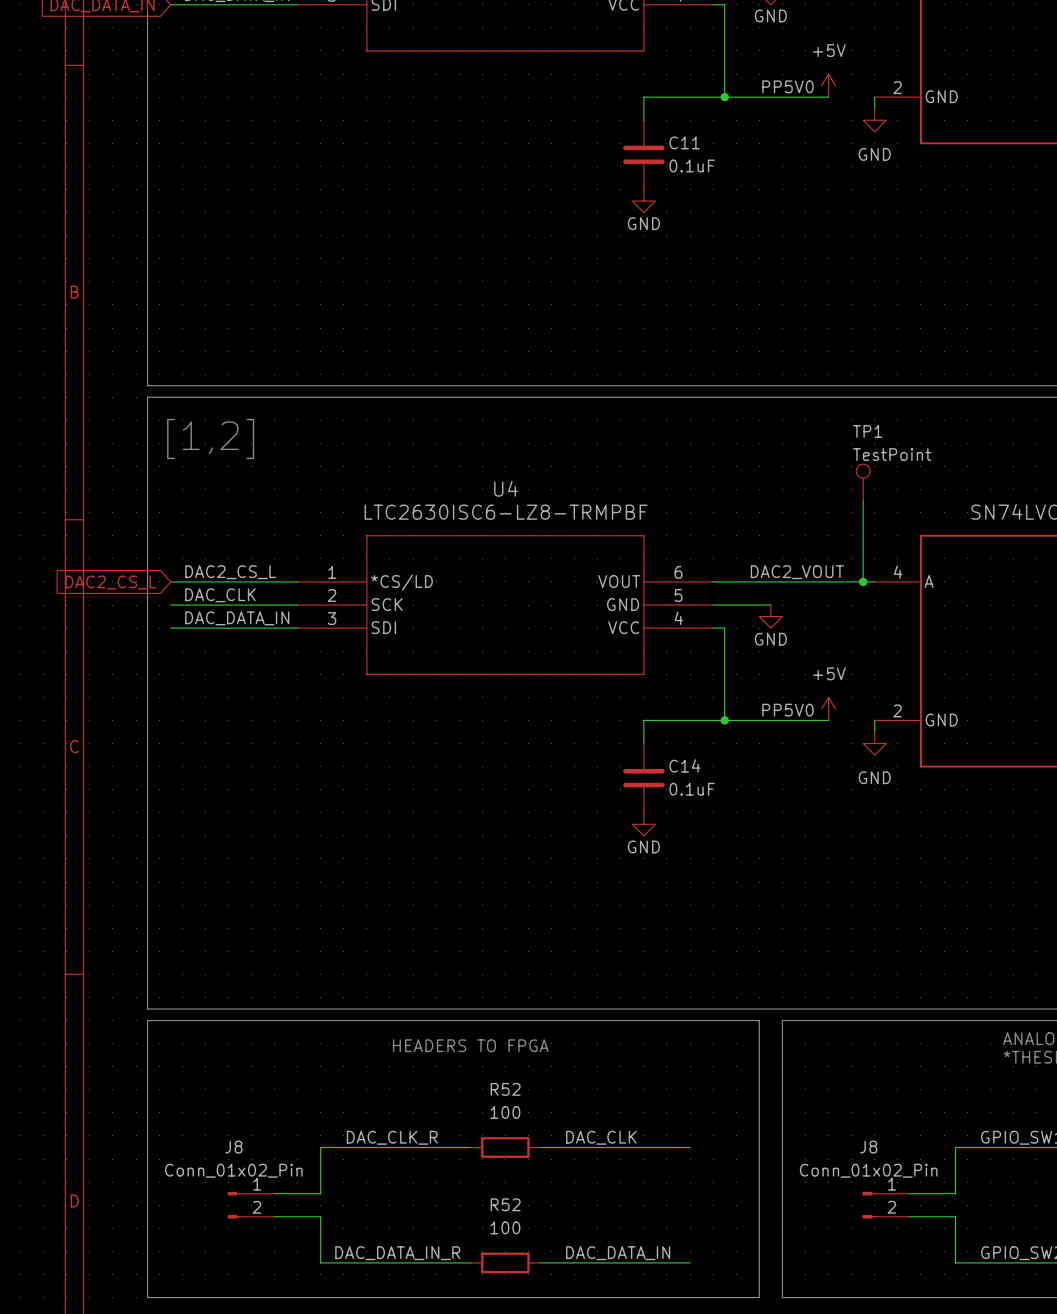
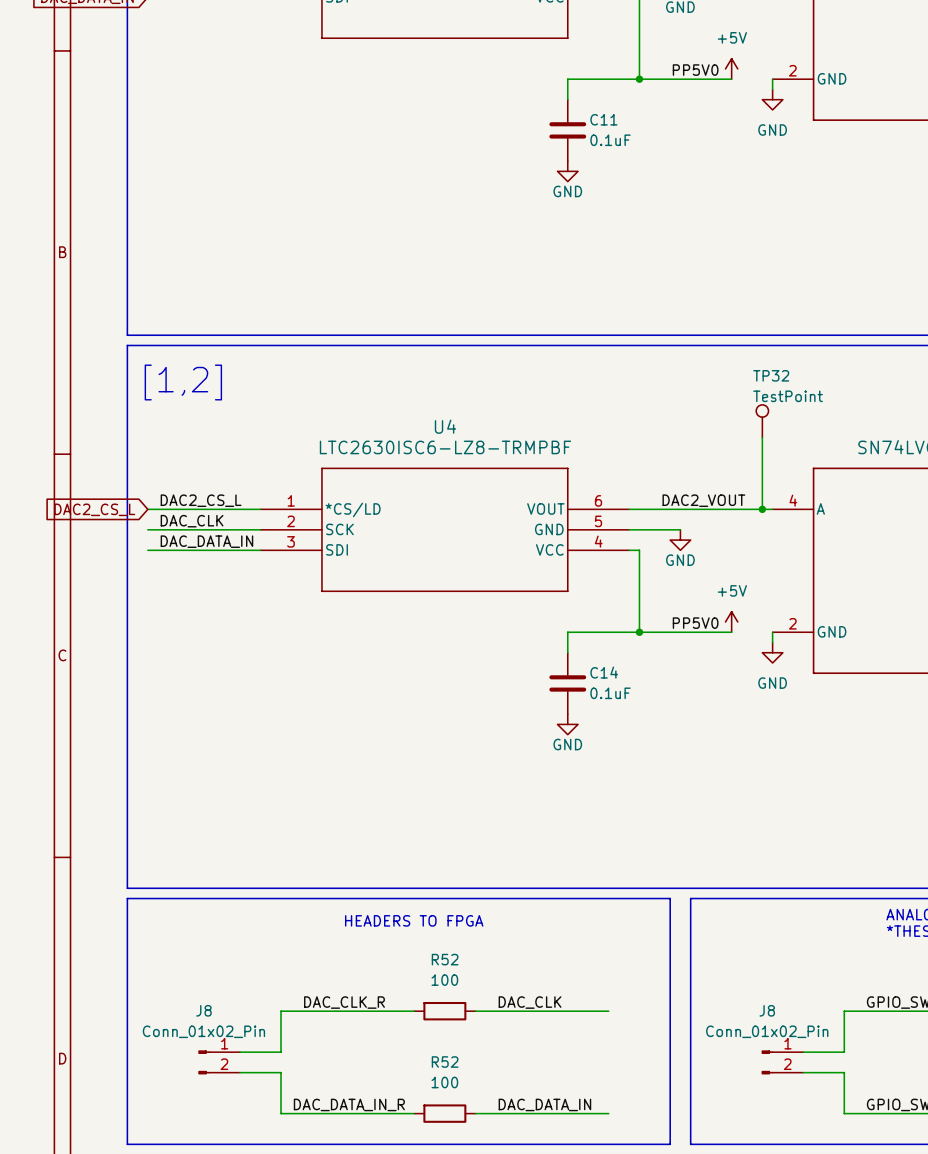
TP1 name: TP1 (867, 431) -> TP32 (771, 375)

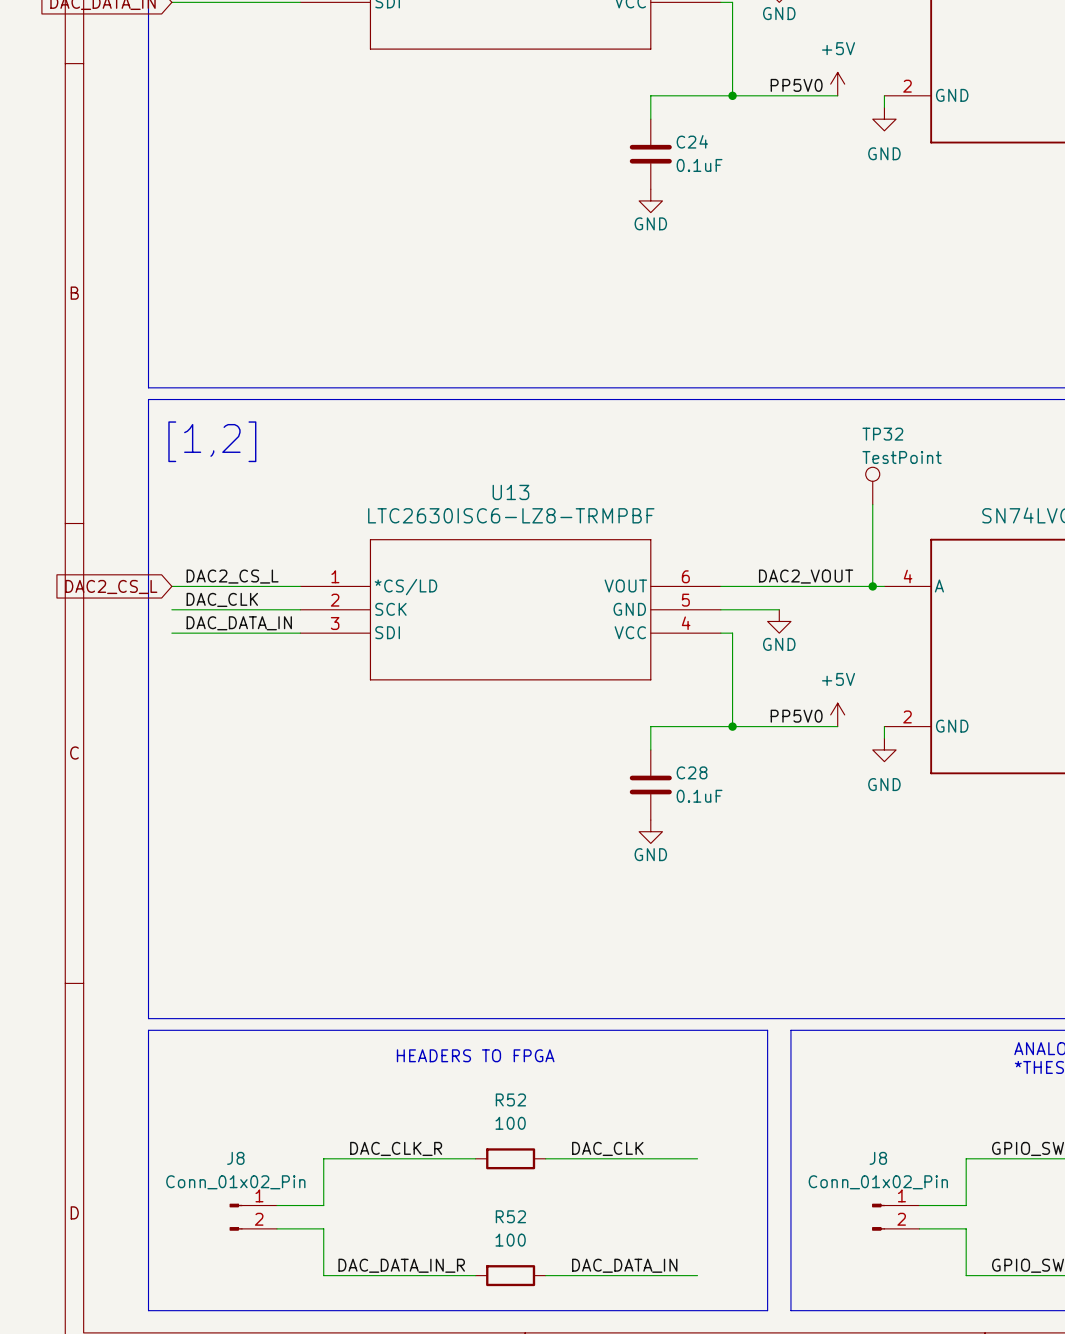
C11 name: C11 (603, 119) -> C24 (692, 141)
U4 name: U4 (445, 426) -> U13 (510, 492)
C14 name: C14 (604, 672) -> C28 (692, 772)

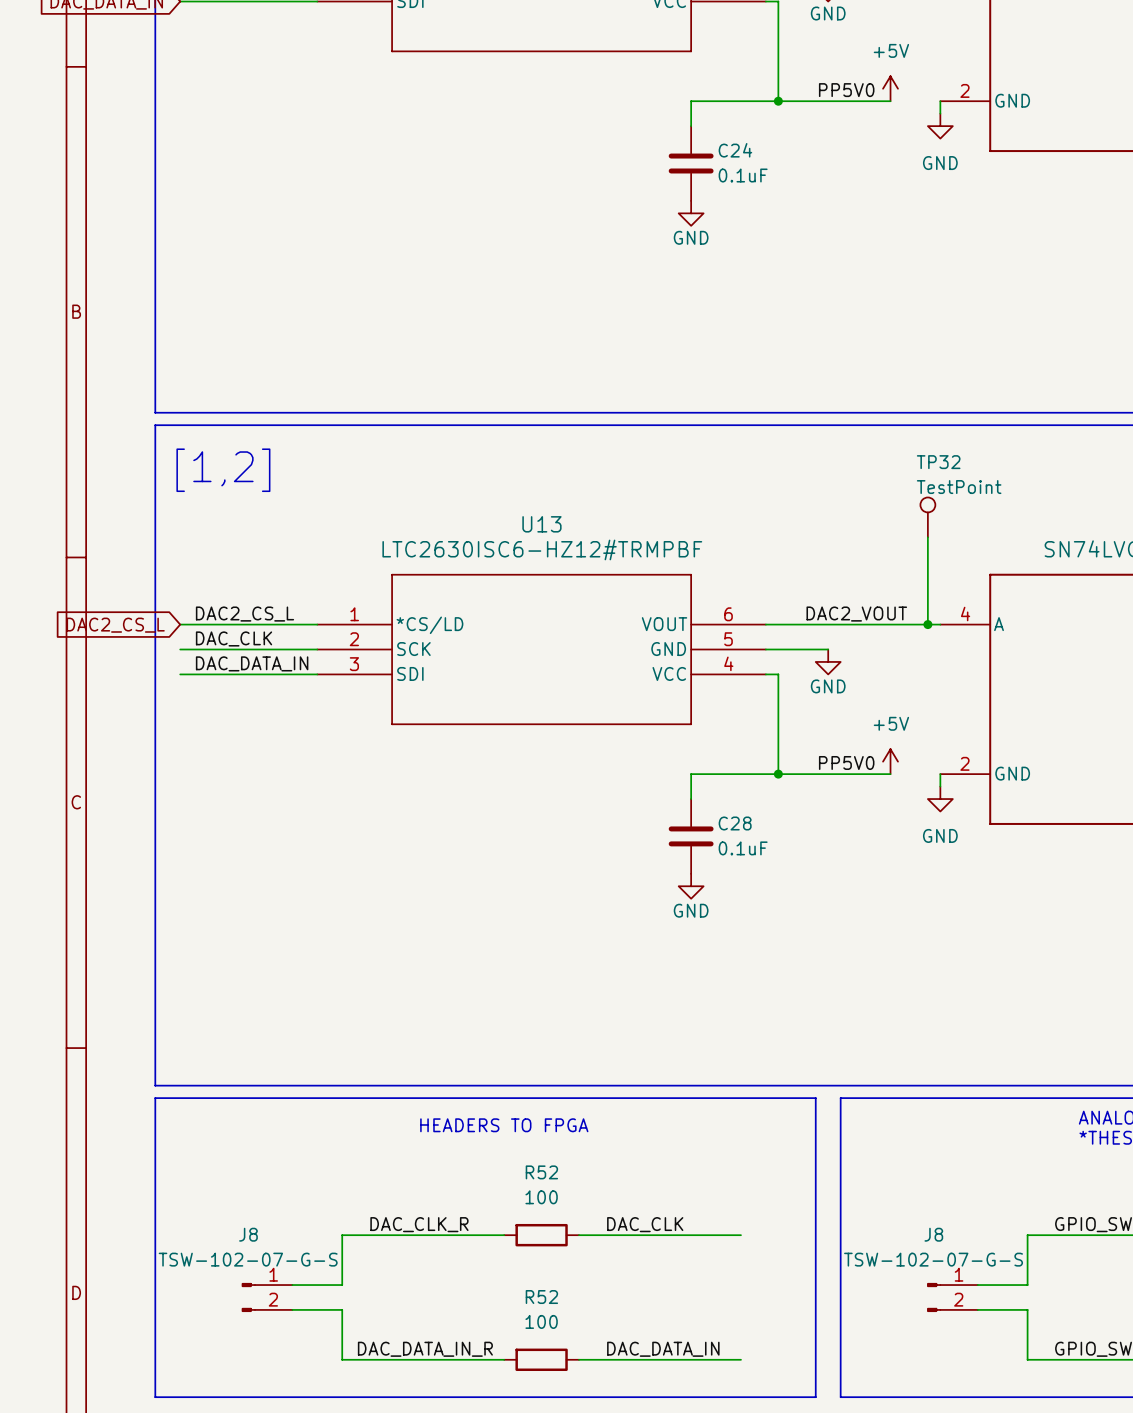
U13 value: LTC2630ISC6-LZ8-TRMPBF (511, 515) -> LTC2630ISC6-HZ12#TRMPBF (542, 549)
J8 value: Conn_01x02_Pin (235, 1182) -> TSW-102-07-G-S (248, 1259)
J8 value: Conn_01x02_Pin (878, 1182) -> TSW-102-07-G-S (933, 1259)

